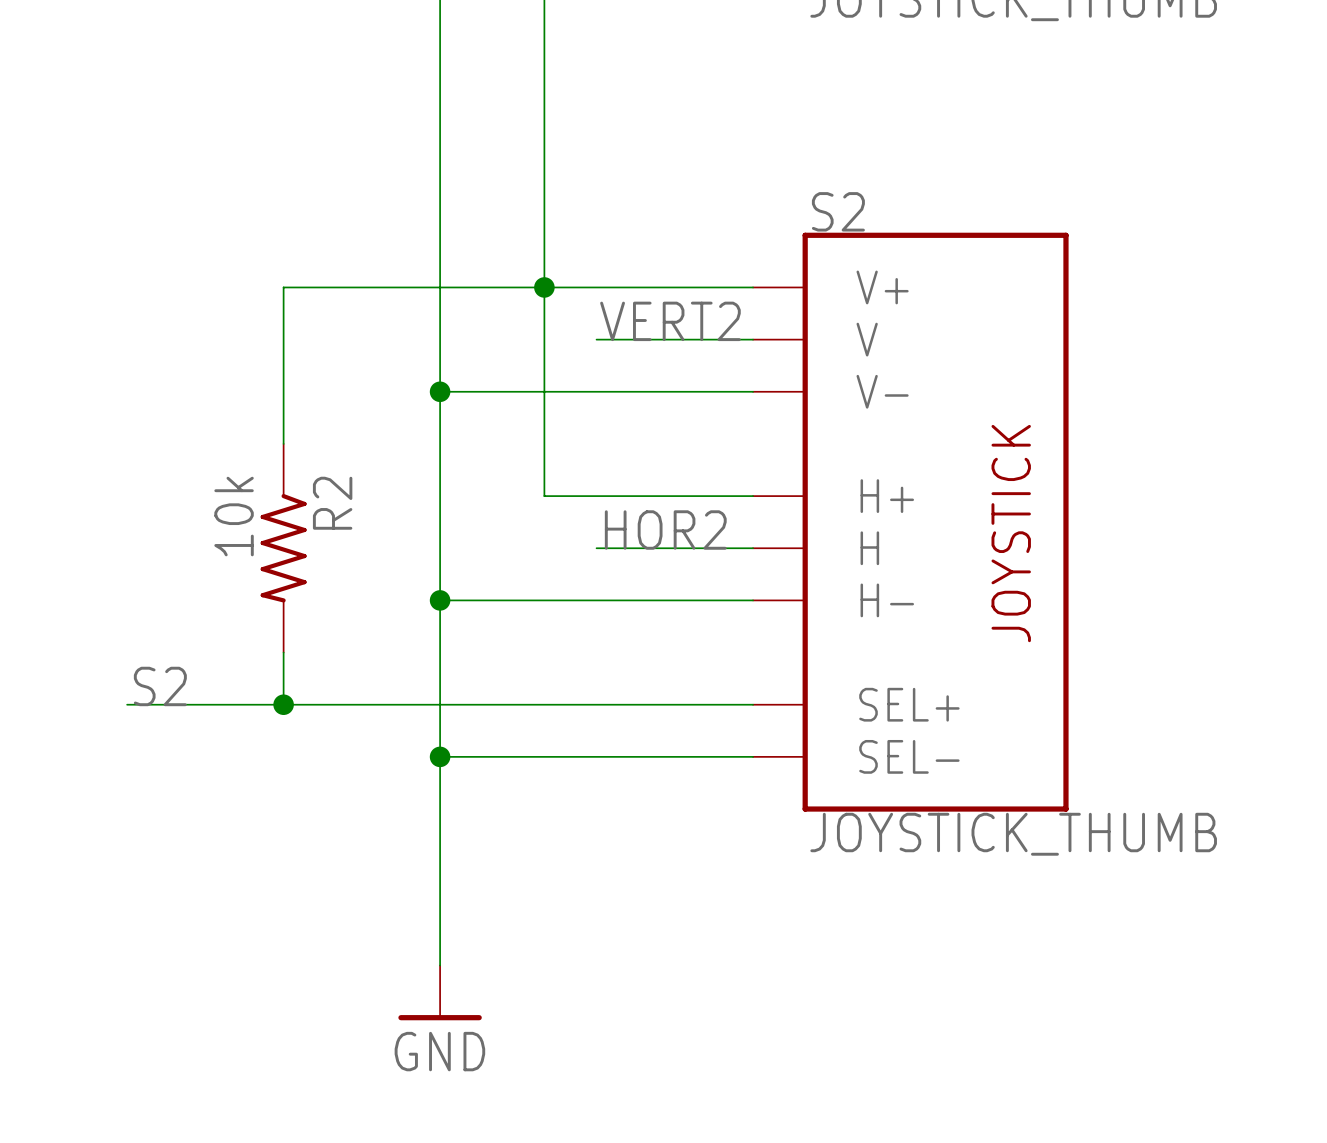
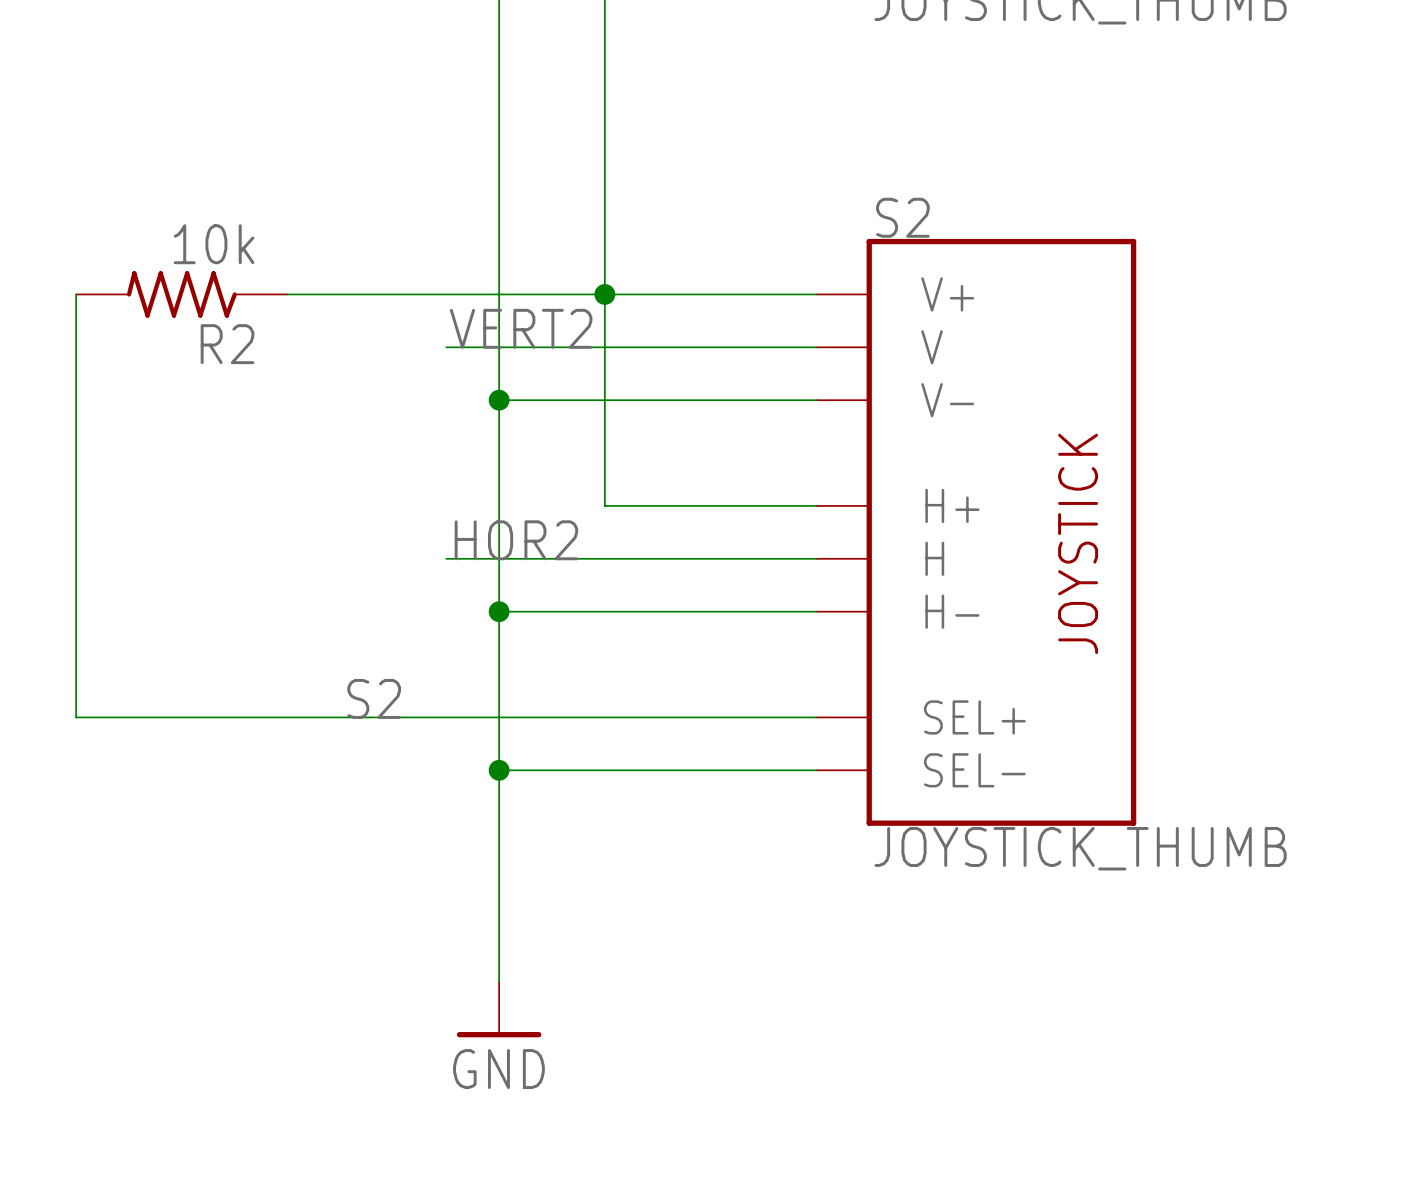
wire: none -> (76, 294) (76, 717) (181, 717)
wire: (283, 287) (283, 443) -> (340, 294) (287, 294)
label position: VERT2 (670, 321) -> VERT2 (521, 328)
wire: none -> (446, 347) (657, 347)
label position: HOR2 (665, 529) -> HOR2 (516, 540)
R2 rotation: 0° (283, 548) -> 90° clockwise (181, 294)
R2 position: (283, 548) -> (181, 294)
wire: none -> (446, 558) (657, 558)
wire: (283, 652) (283, 704) -> none
label position: S2 (160, 686) -> S2 (374, 698)
junction: (283, 704) -> none

